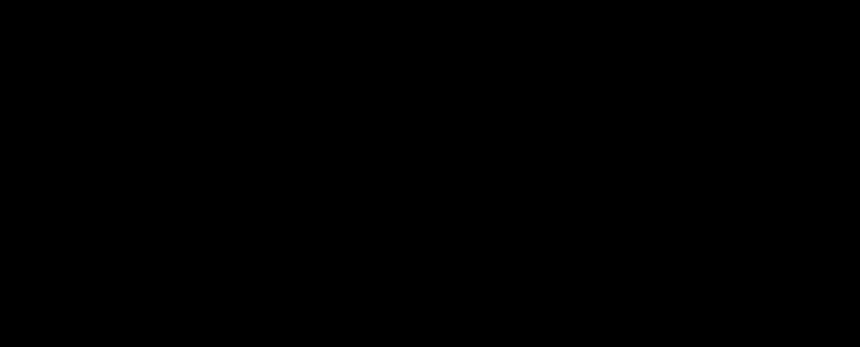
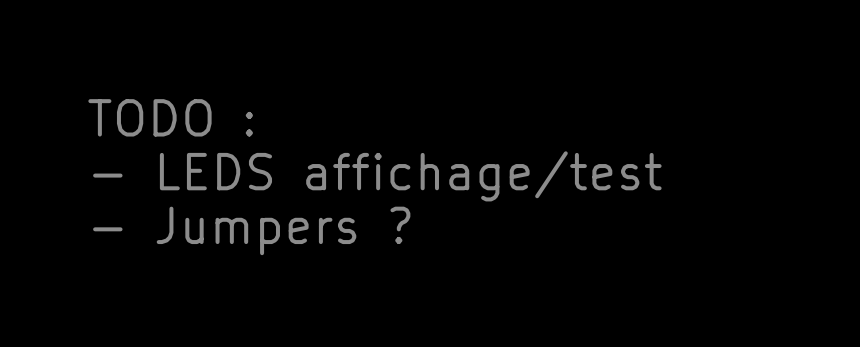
text: none -> TODO : (170, 117)
text: none -> - LEDS affichage/test (377, 176)
text: none -> - Jumpers ? (251, 230)

